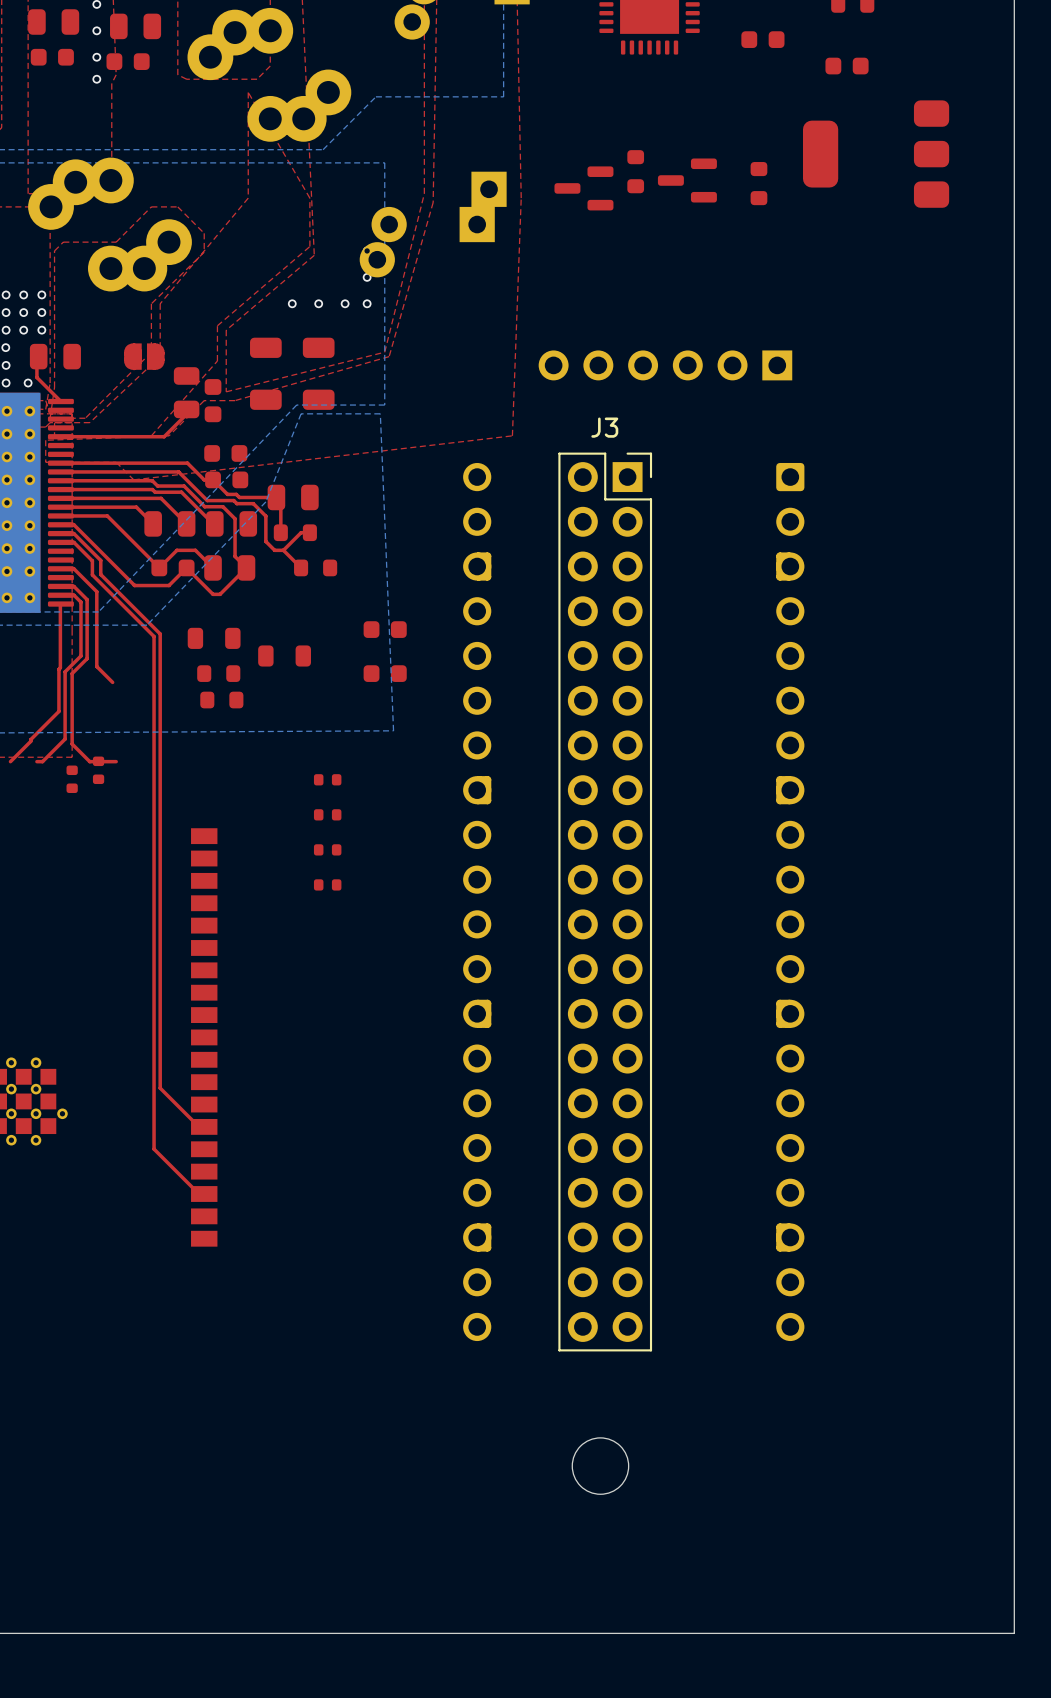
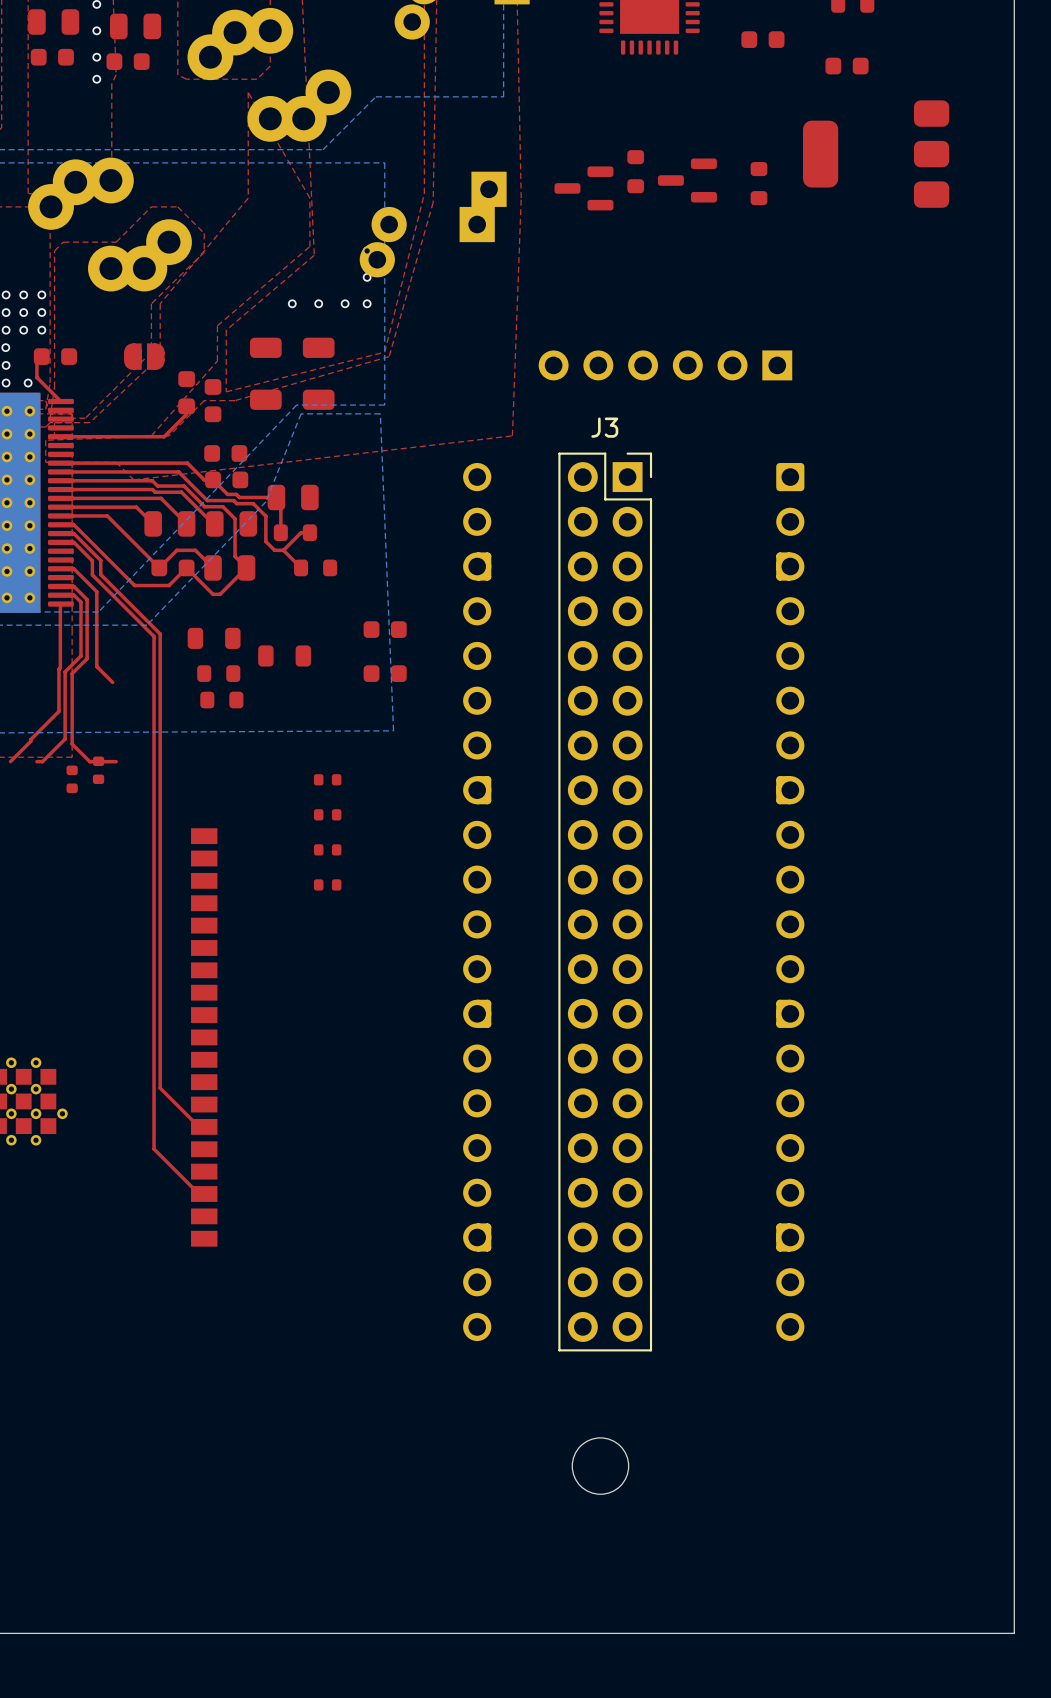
part footprint: [29, 343, 81, 370] -> [33, 348, 77, 365]
part footprint: [173, 367, 200, 419] -> [178, 371, 195, 415]

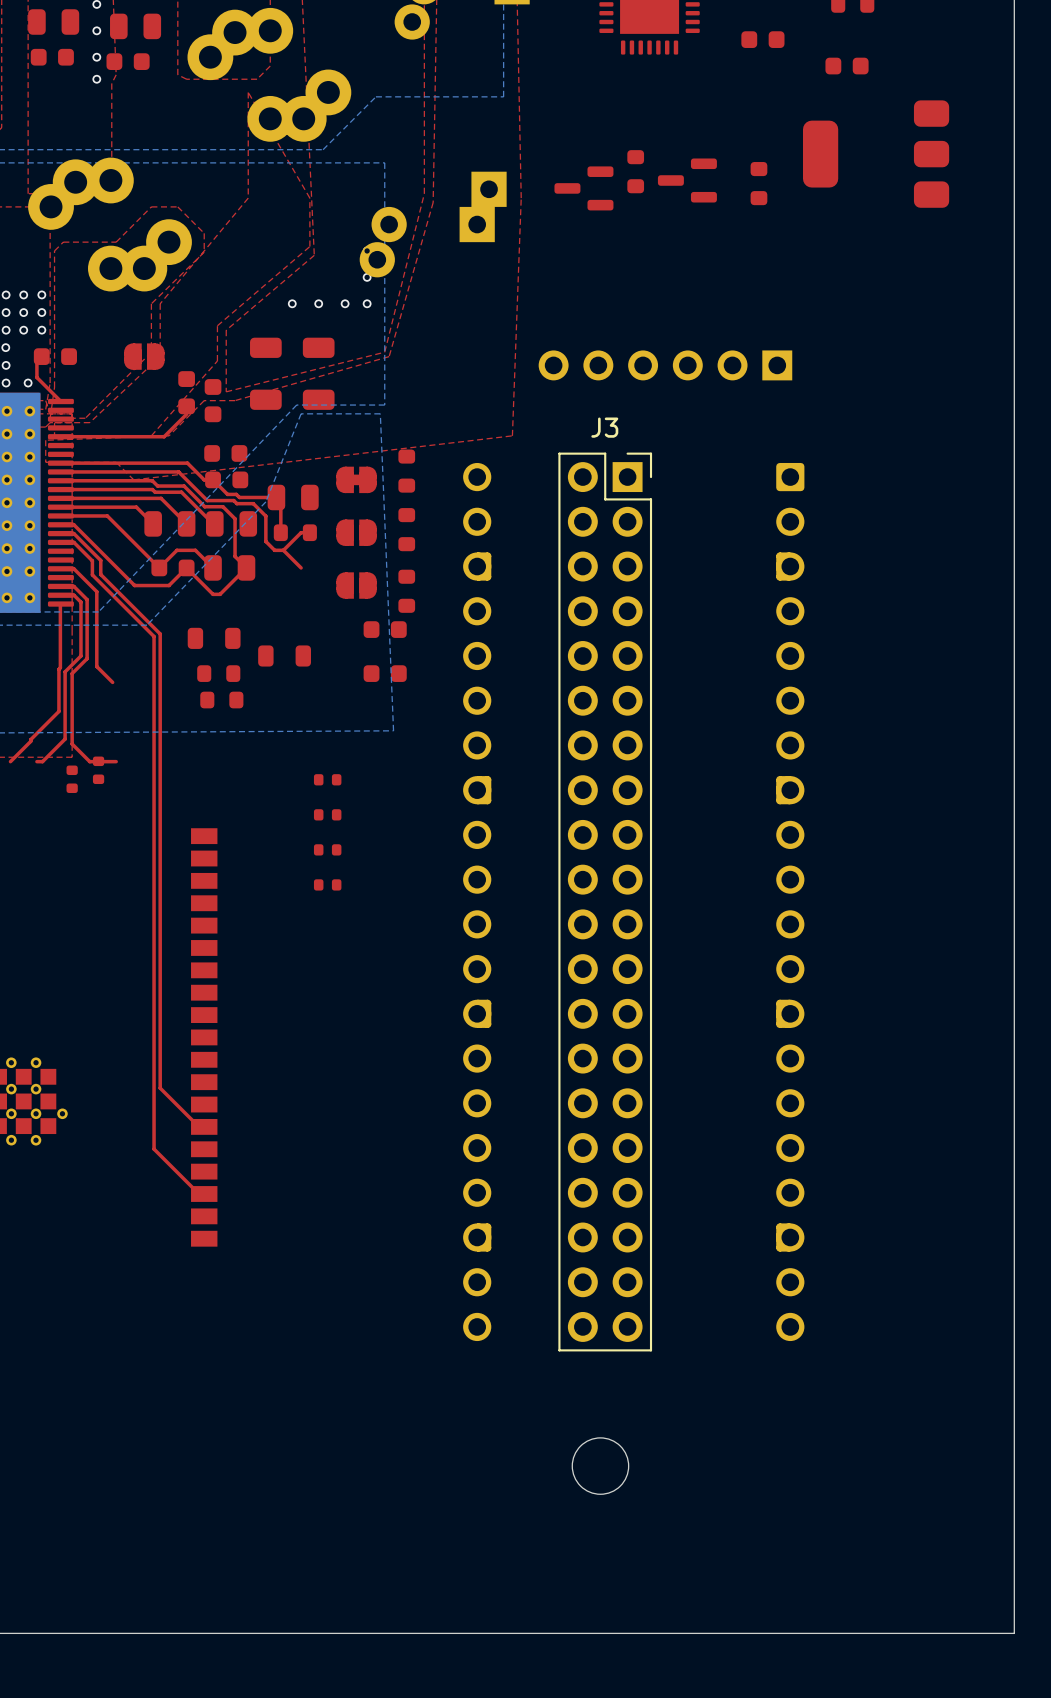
part: none -> (406, 471)
part: none -> (356, 479)
part: none -> (406, 529)
part: none -> (356, 532)
part: (315, 567) -> none
part: none -> (356, 585)
part: none -> (406, 591)

